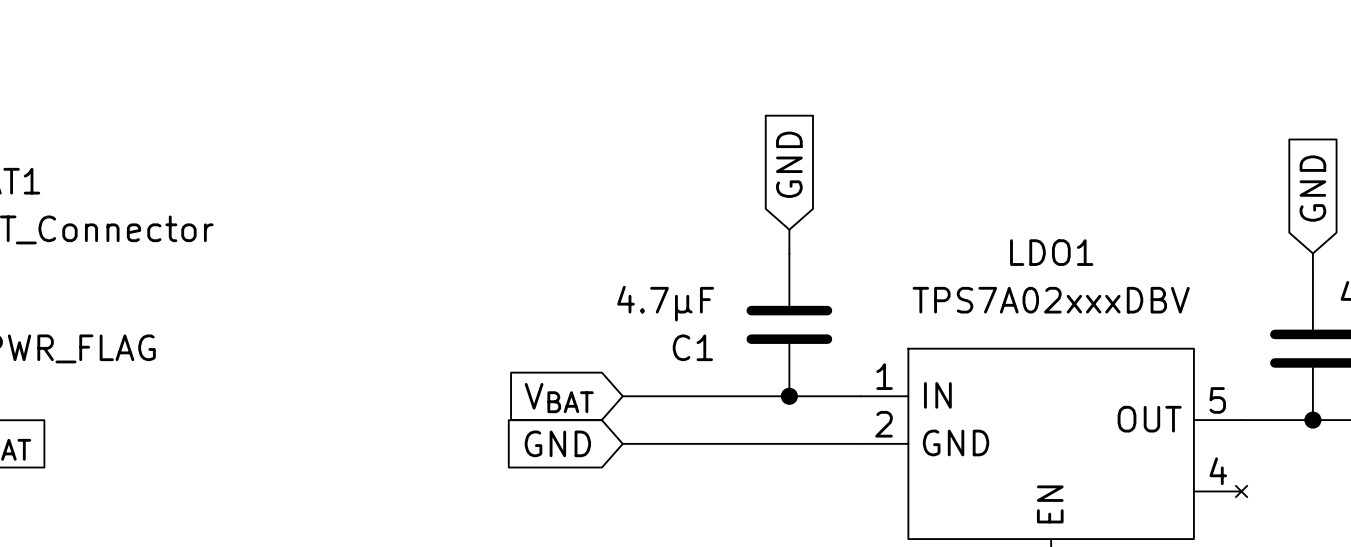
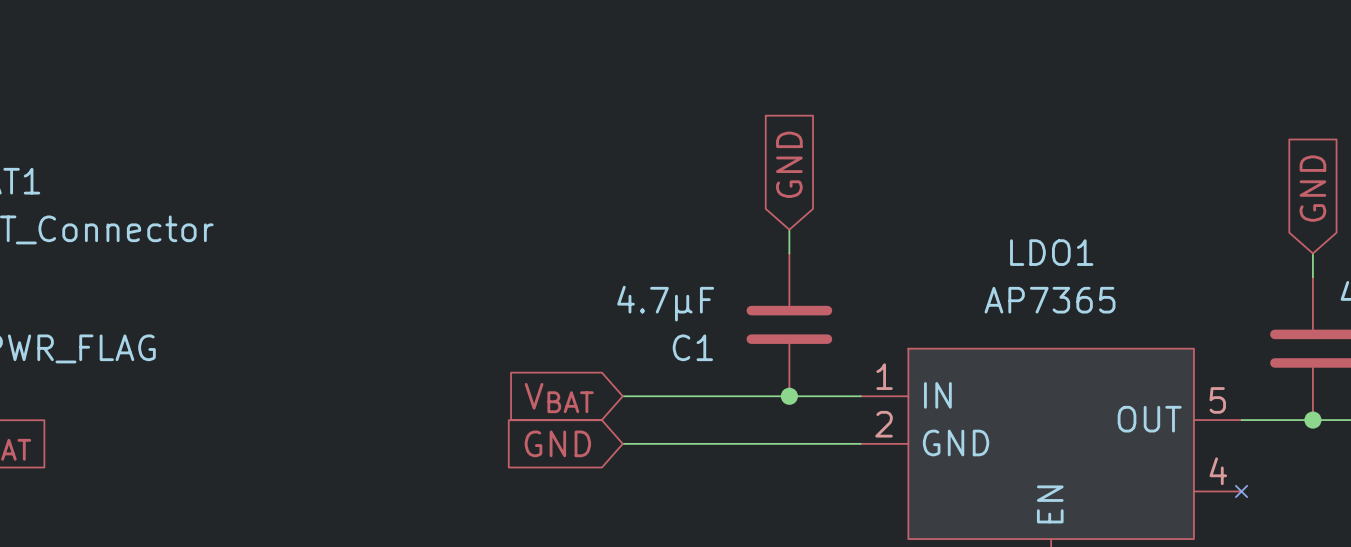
LDO1 value: TPS7A02xxxDBV (1051, 300) -> AP7365 (1050, 300)

